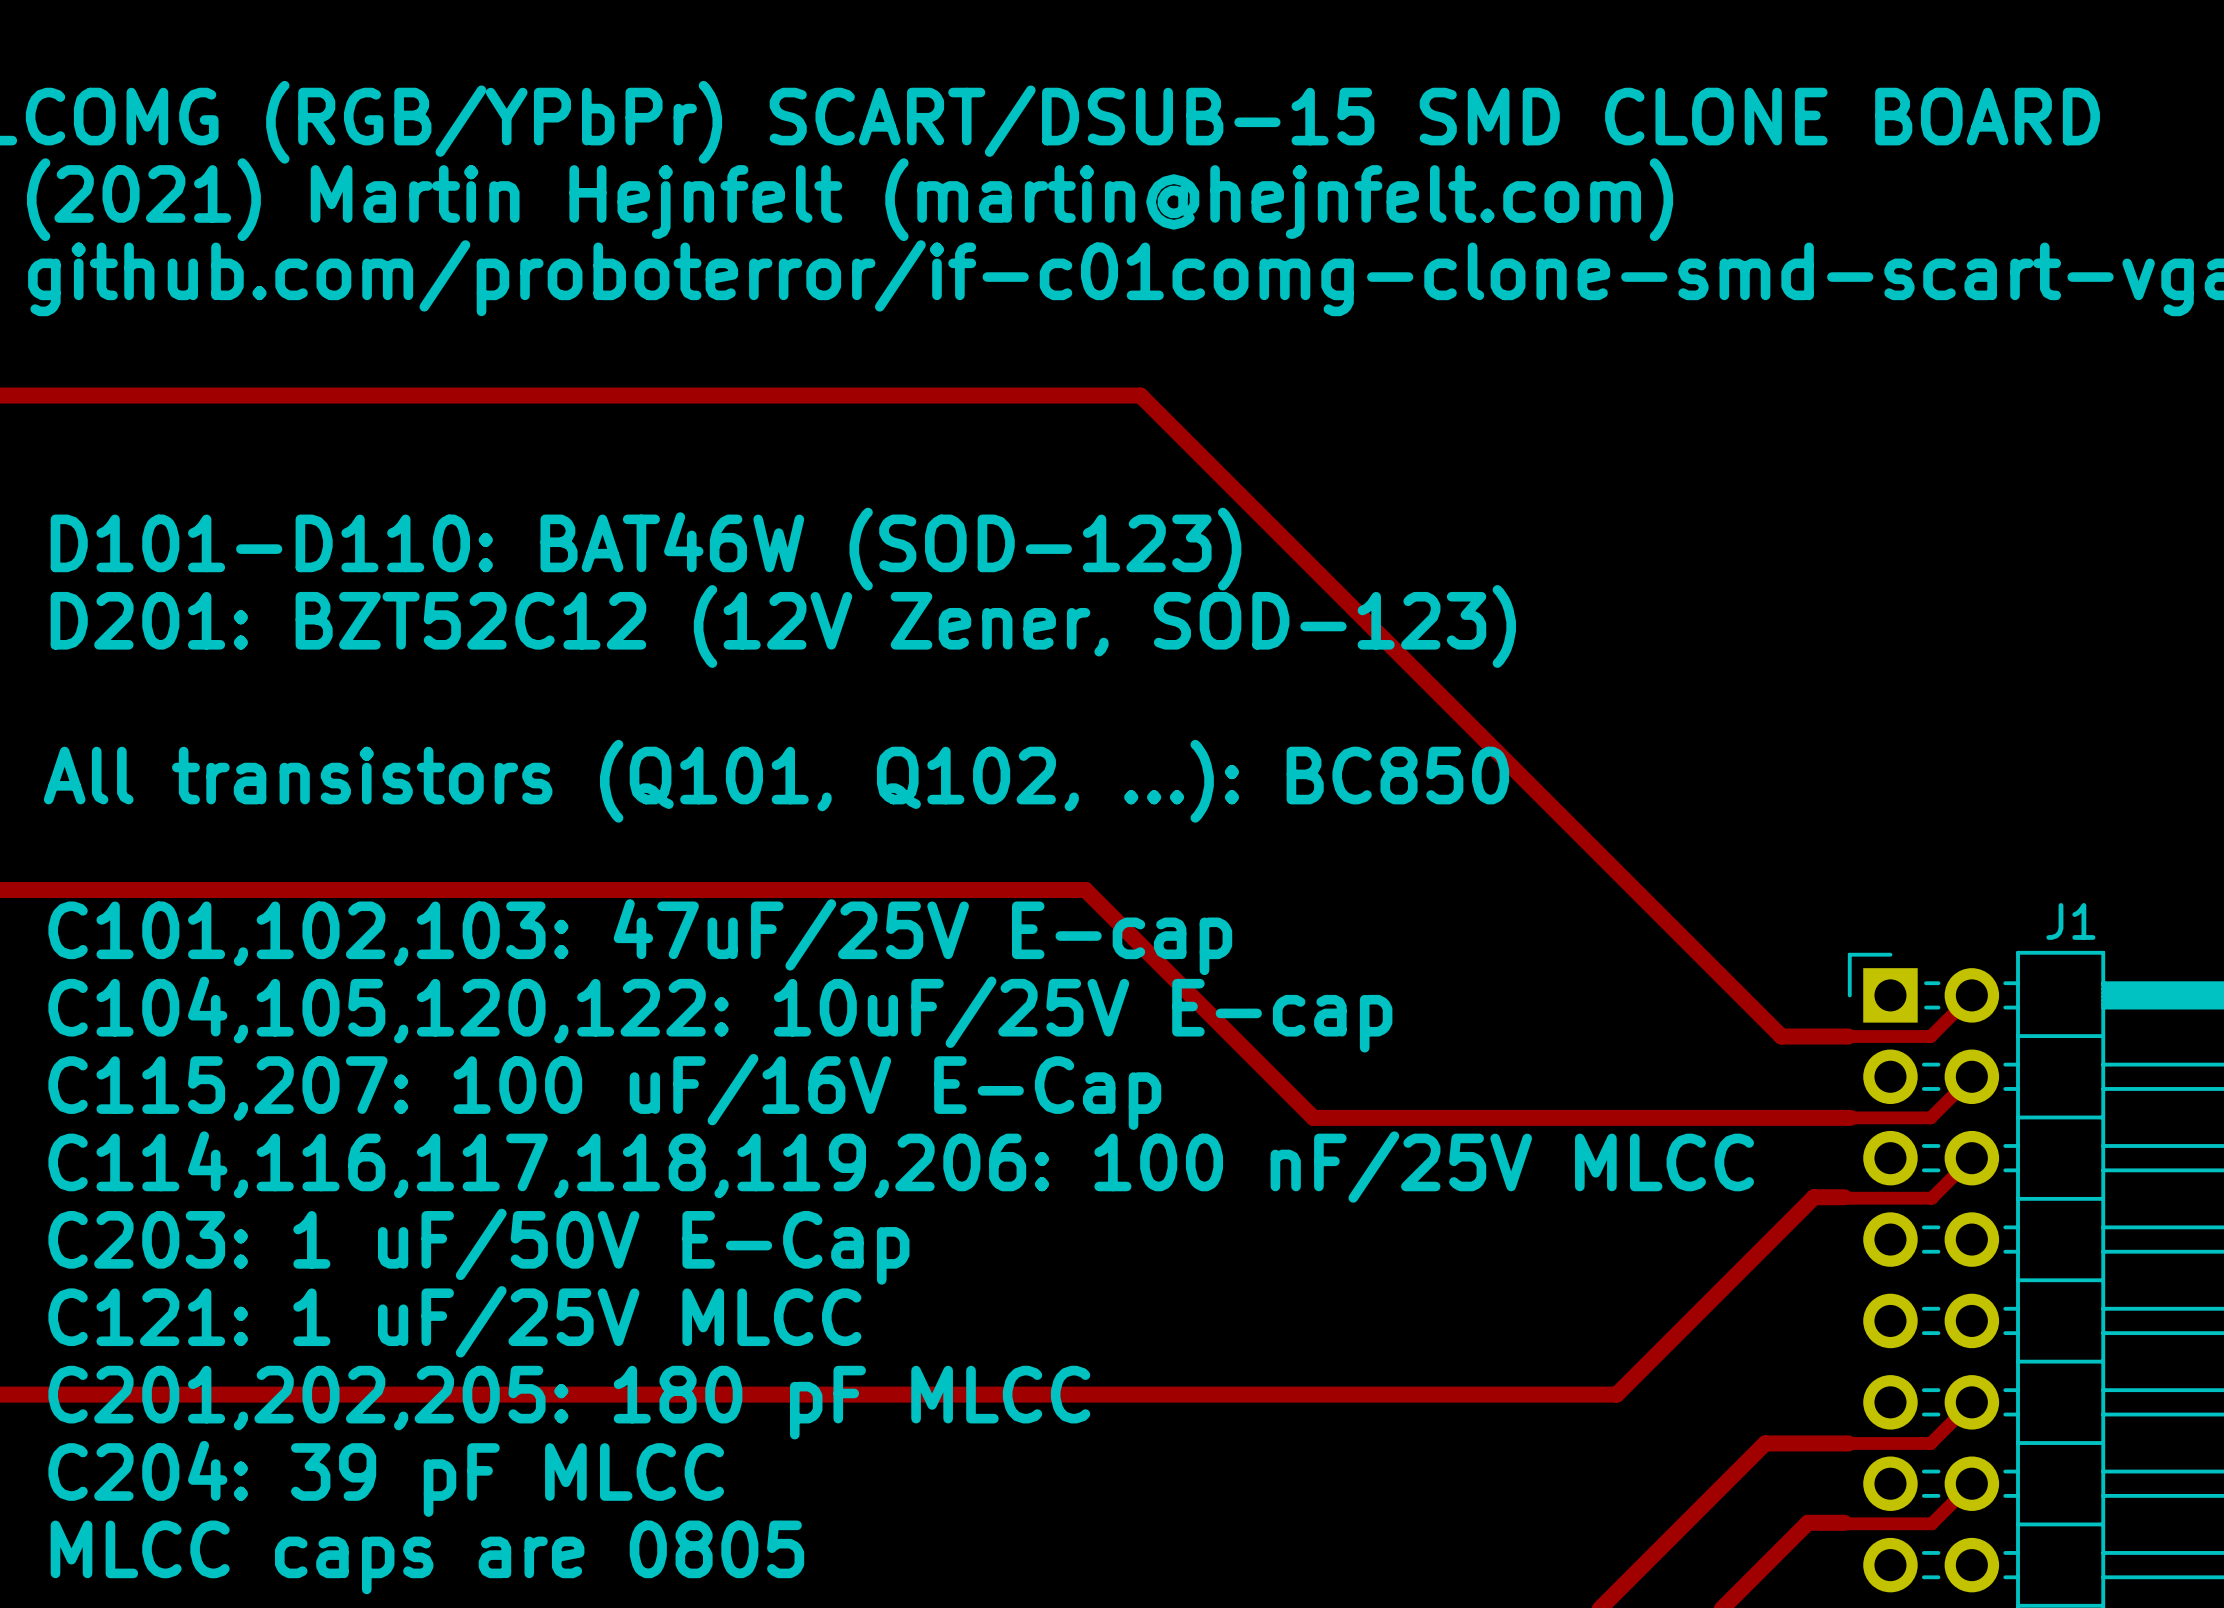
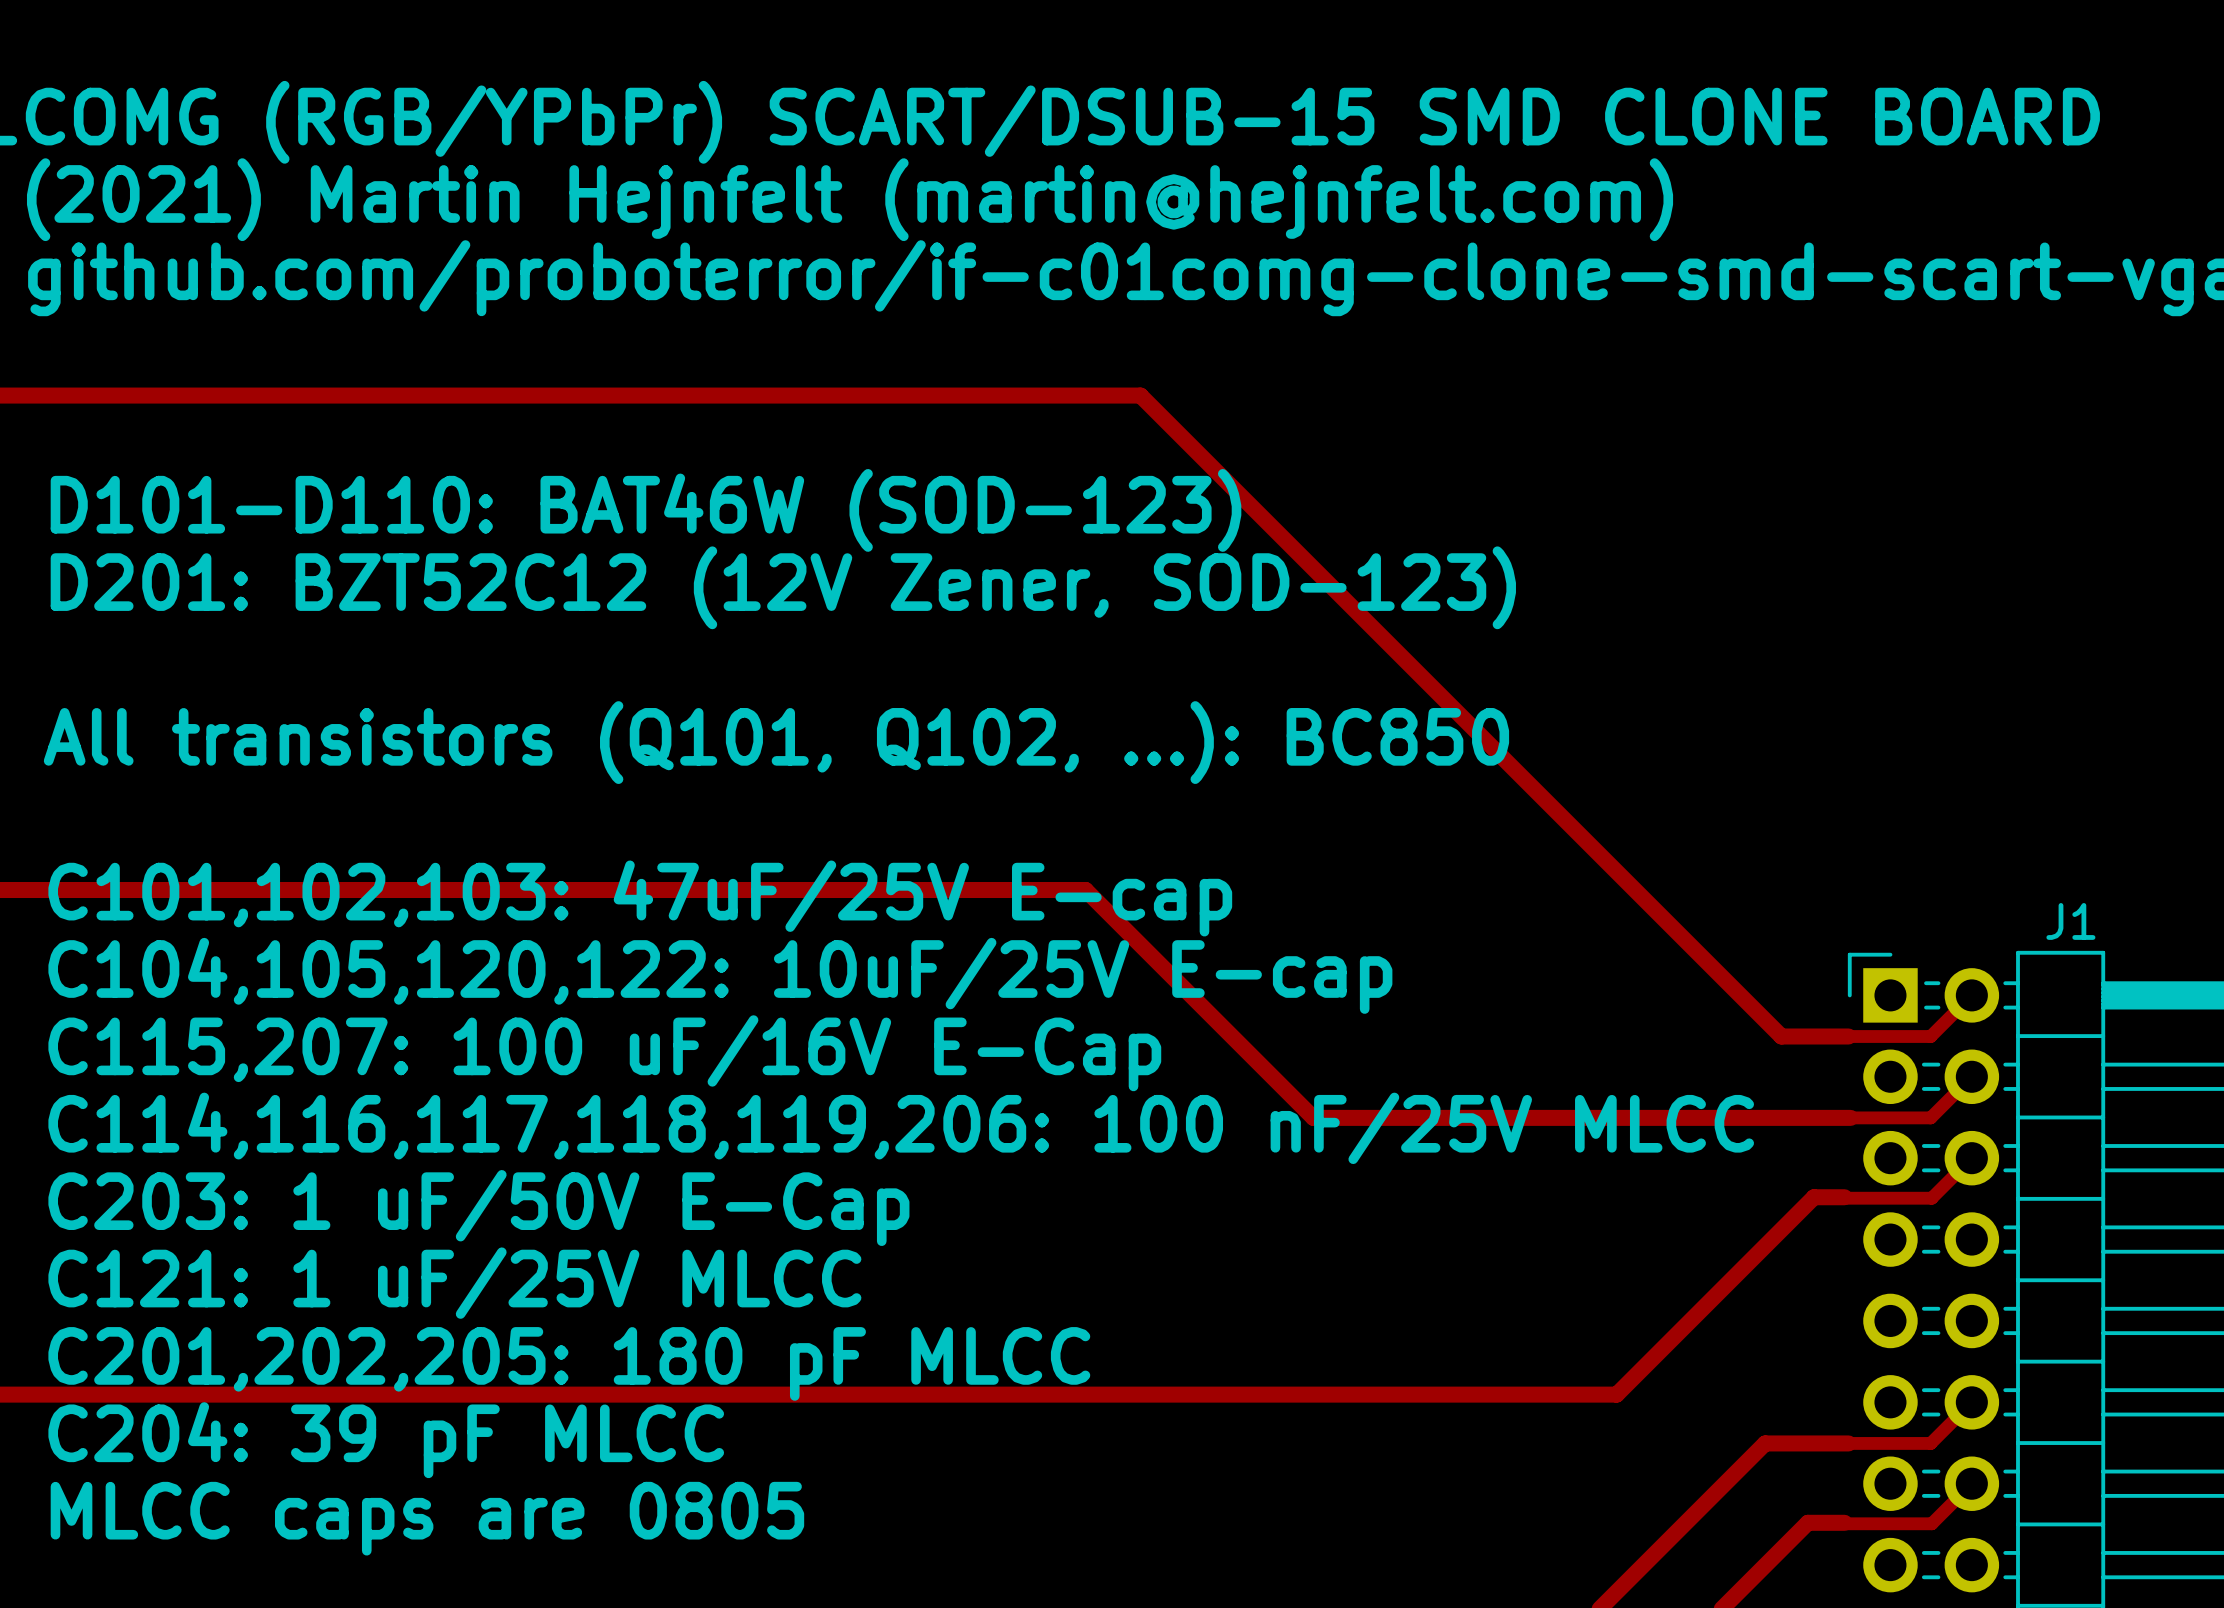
text position: D101-D110: BAT46W (SOD-123) (646, 549) -> D101-D110: BAT46W (SOD-123) (646, 510)
text position: D201: BZT52C12 (12V Zener, SOD-123) (783, 626) -> D201: BZT52C12 (12V Zener, SOD-123) (783, 587)
text position: All transistors (Q101, Q102, ...): BC850 (776, 781) -> All transistors (Q101, Q102, ...): BC850 (776, 742)
text position: C101,102,103: 47uF/25V E-cap (640, 937) -> C101,102,103: 47uF/25V E-cap (640, 898)
text position: C104,105,120,122: 10uF/25V E-cap (720, 1014) -> C104,105,120,122: 10uF/25V E-cap (720, 975)
text position: C115,207: 100 uF/16V E-Cap (604, 1091) -> C115,207: 100 uF/16V E-Cap (604, 1053)
text position: C114,116,117,118,119,206: 100 nF/25V MLCC (901, 1167) -> C114,116,117,118,119,206: 100 nF/25V MLCC (901, 1128)
text position: C203: 1 uF/50V E-Cap (478, 1246) -> C203: 1 uF/50V E-Cap (478, 1208)
text position: C121: 1 uF/25V MLCC (454, 1321) -> C121: 1 uF/25V MLCC (454, 1283)
text position: C201,202,205: 180 pF MLCC (569, 1402) -> C201,202,205: 180 pF MLCC (569, 1363)
text position: C204: 39 pF MLCC (386, 1478) -> C204: 39 pF MLCC (386, 1440)
text position: MLCC caps are 0805 (427, 1557) -> MLCC caps are 0805 (427, 1518)

